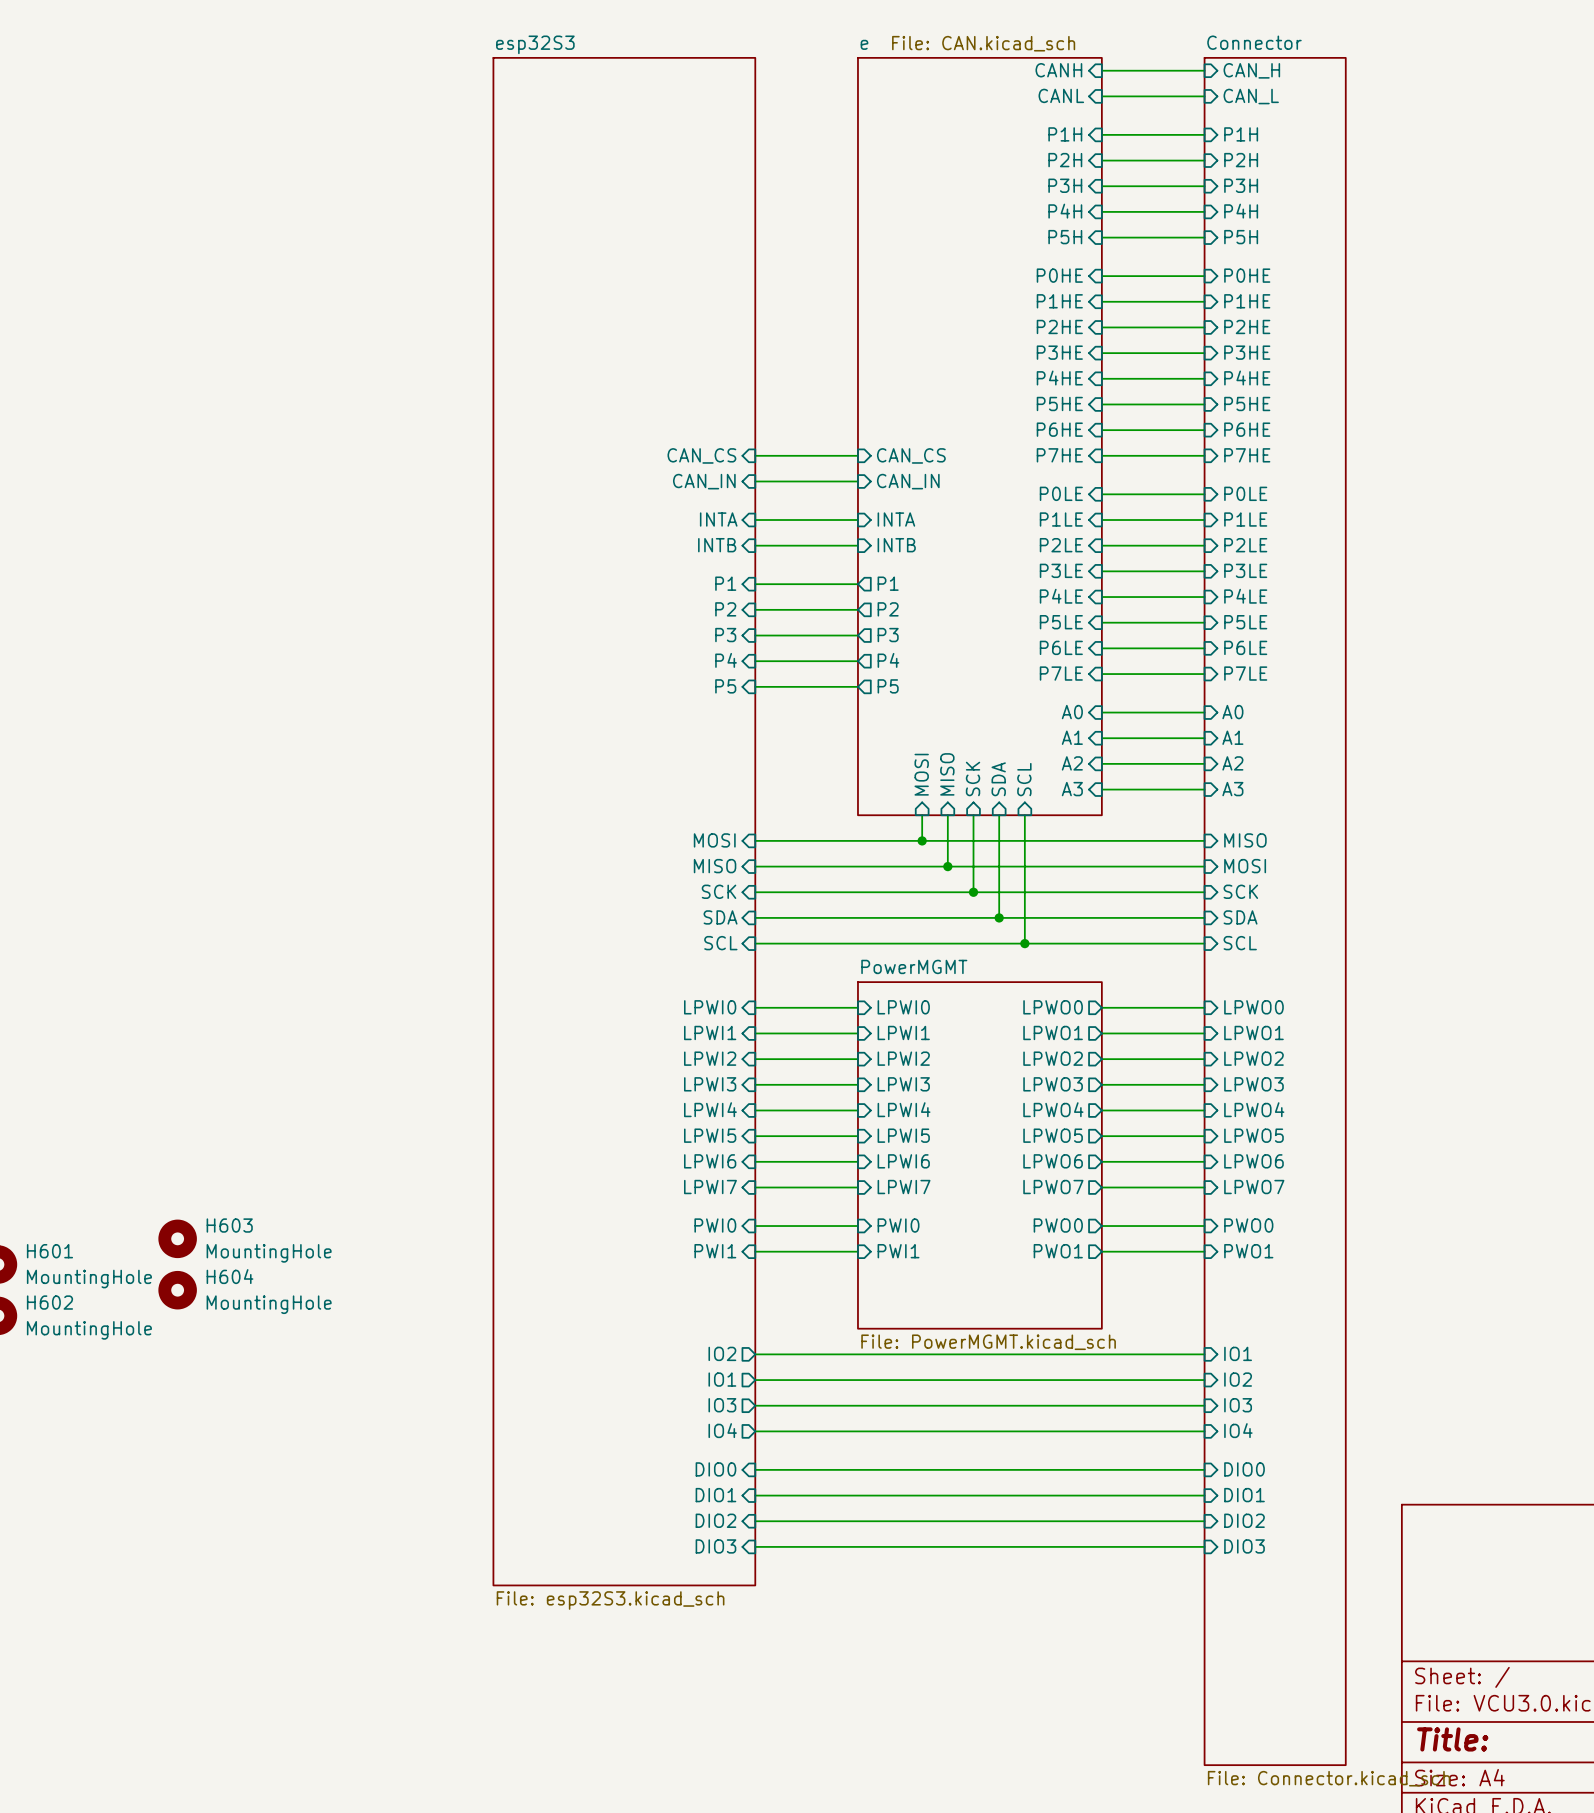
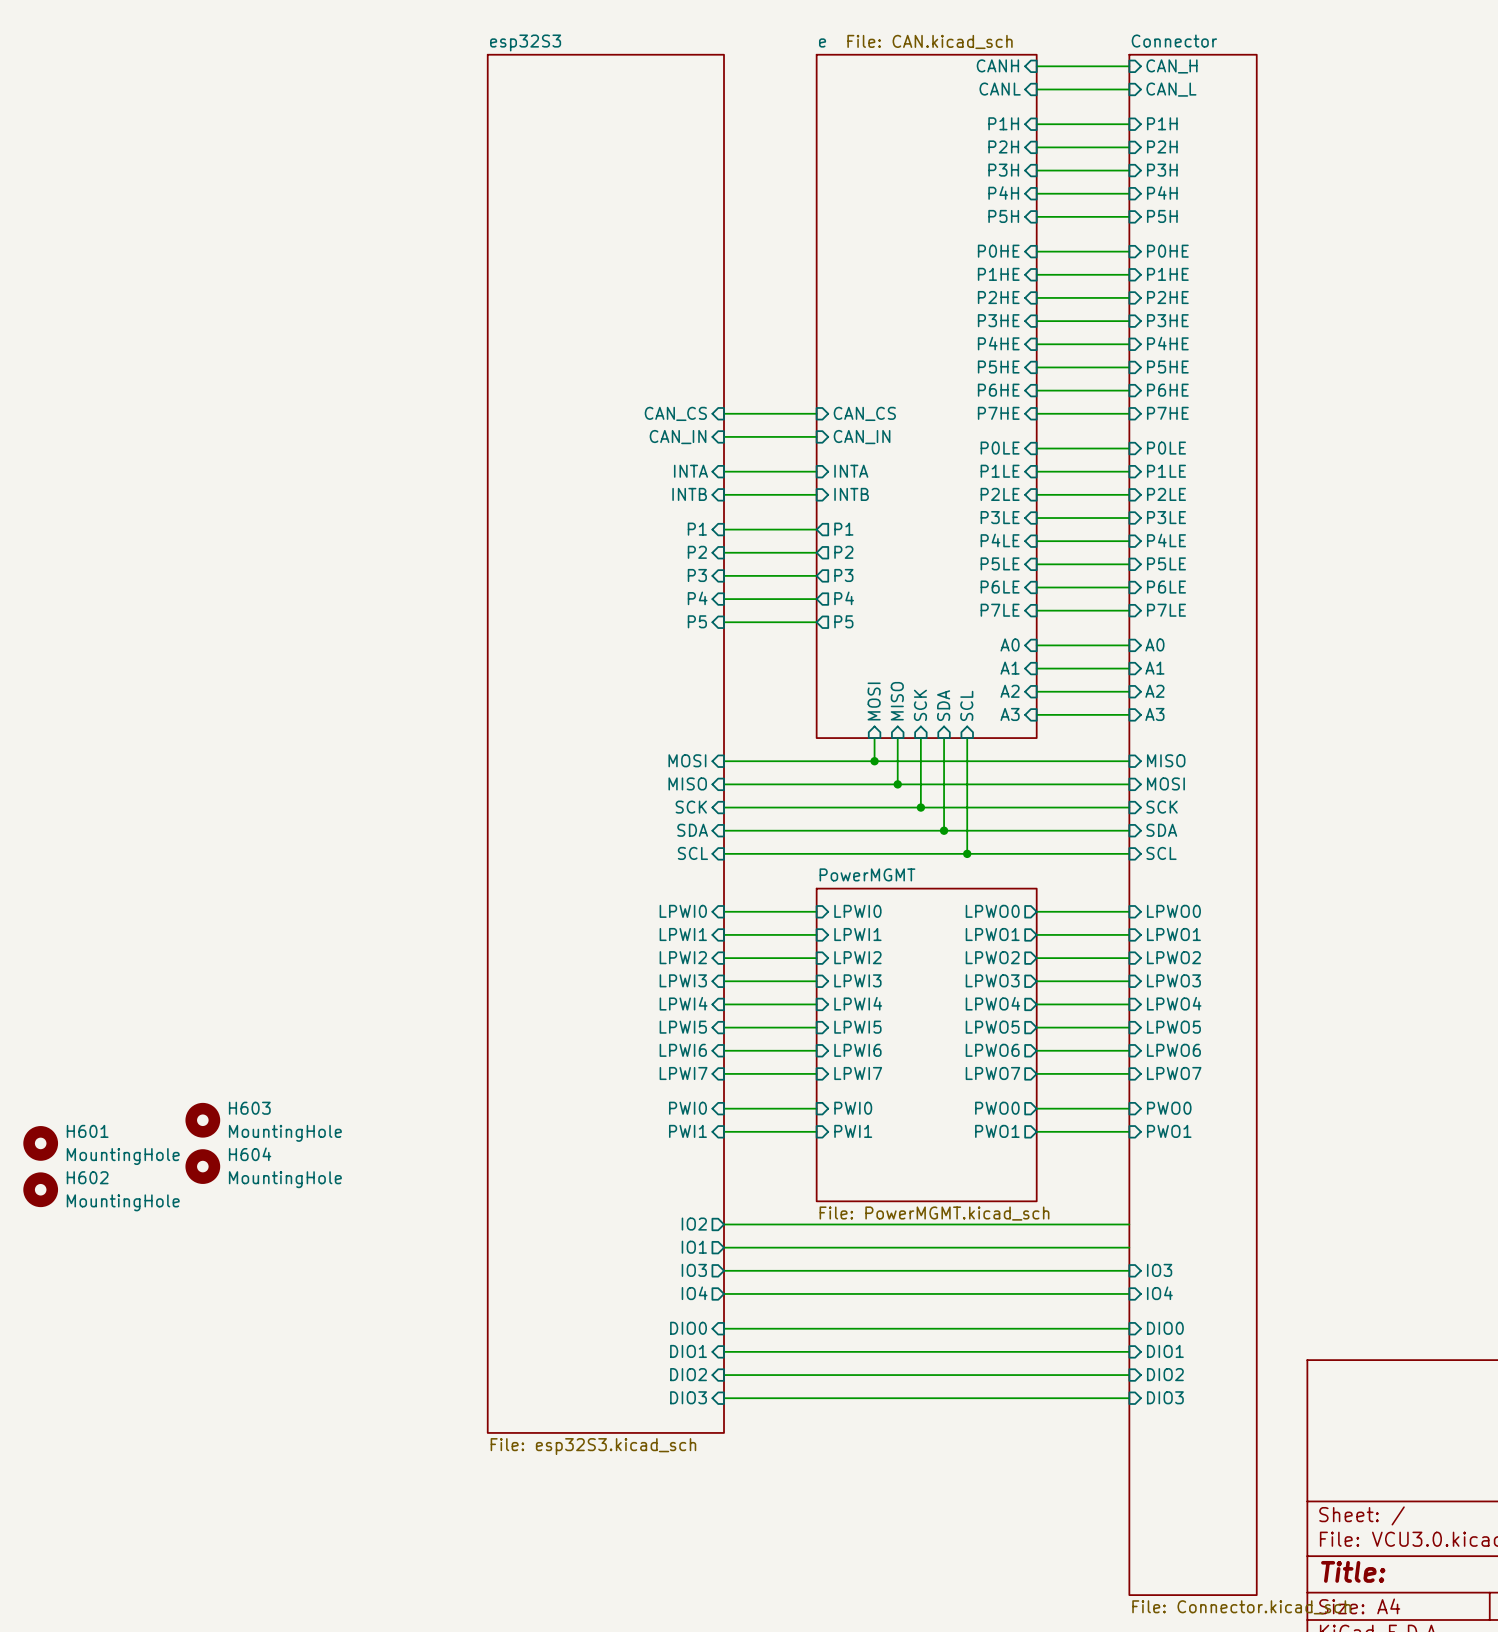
sheet pin: IO1 (1238, 1353) -> none
sheet pin: IO2 (1238, 1379) -> none

